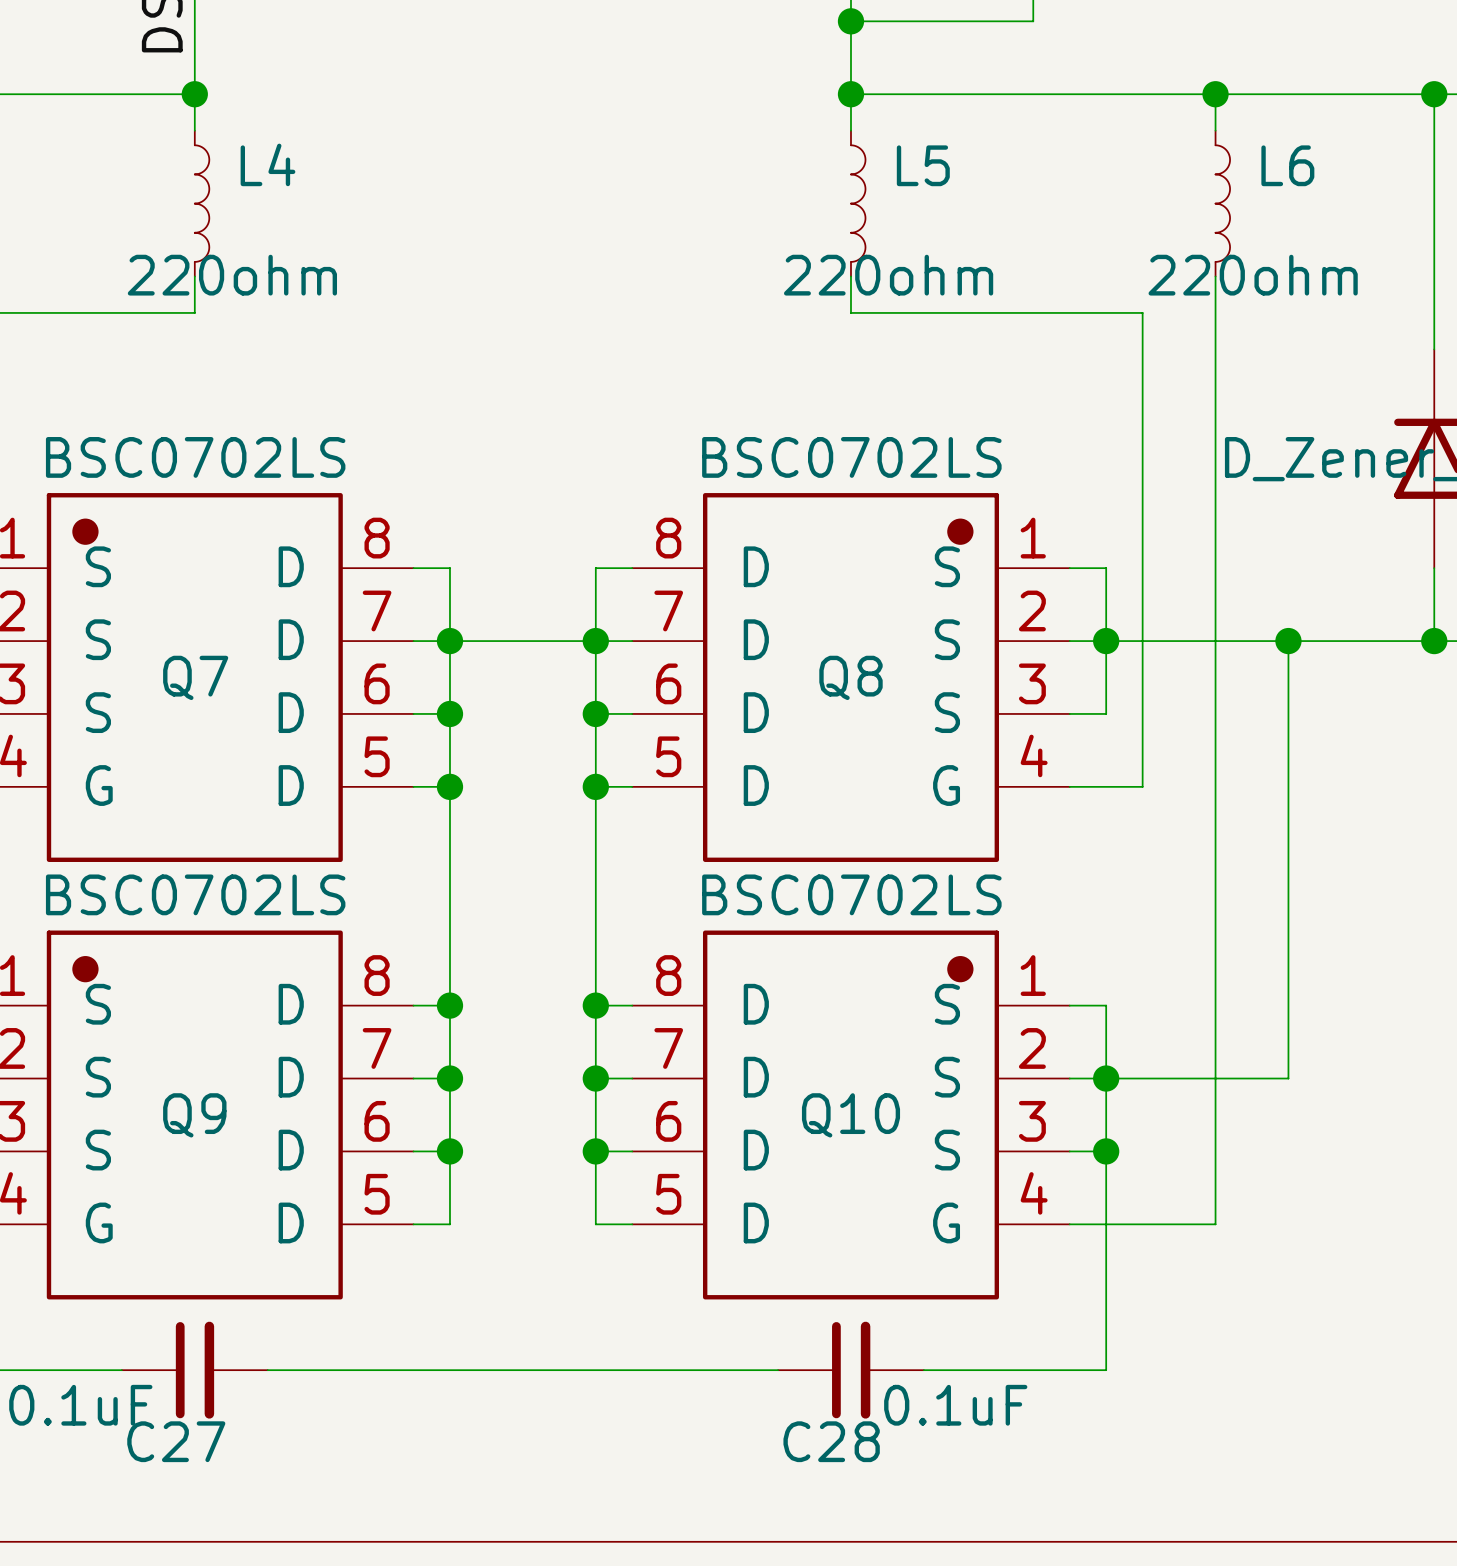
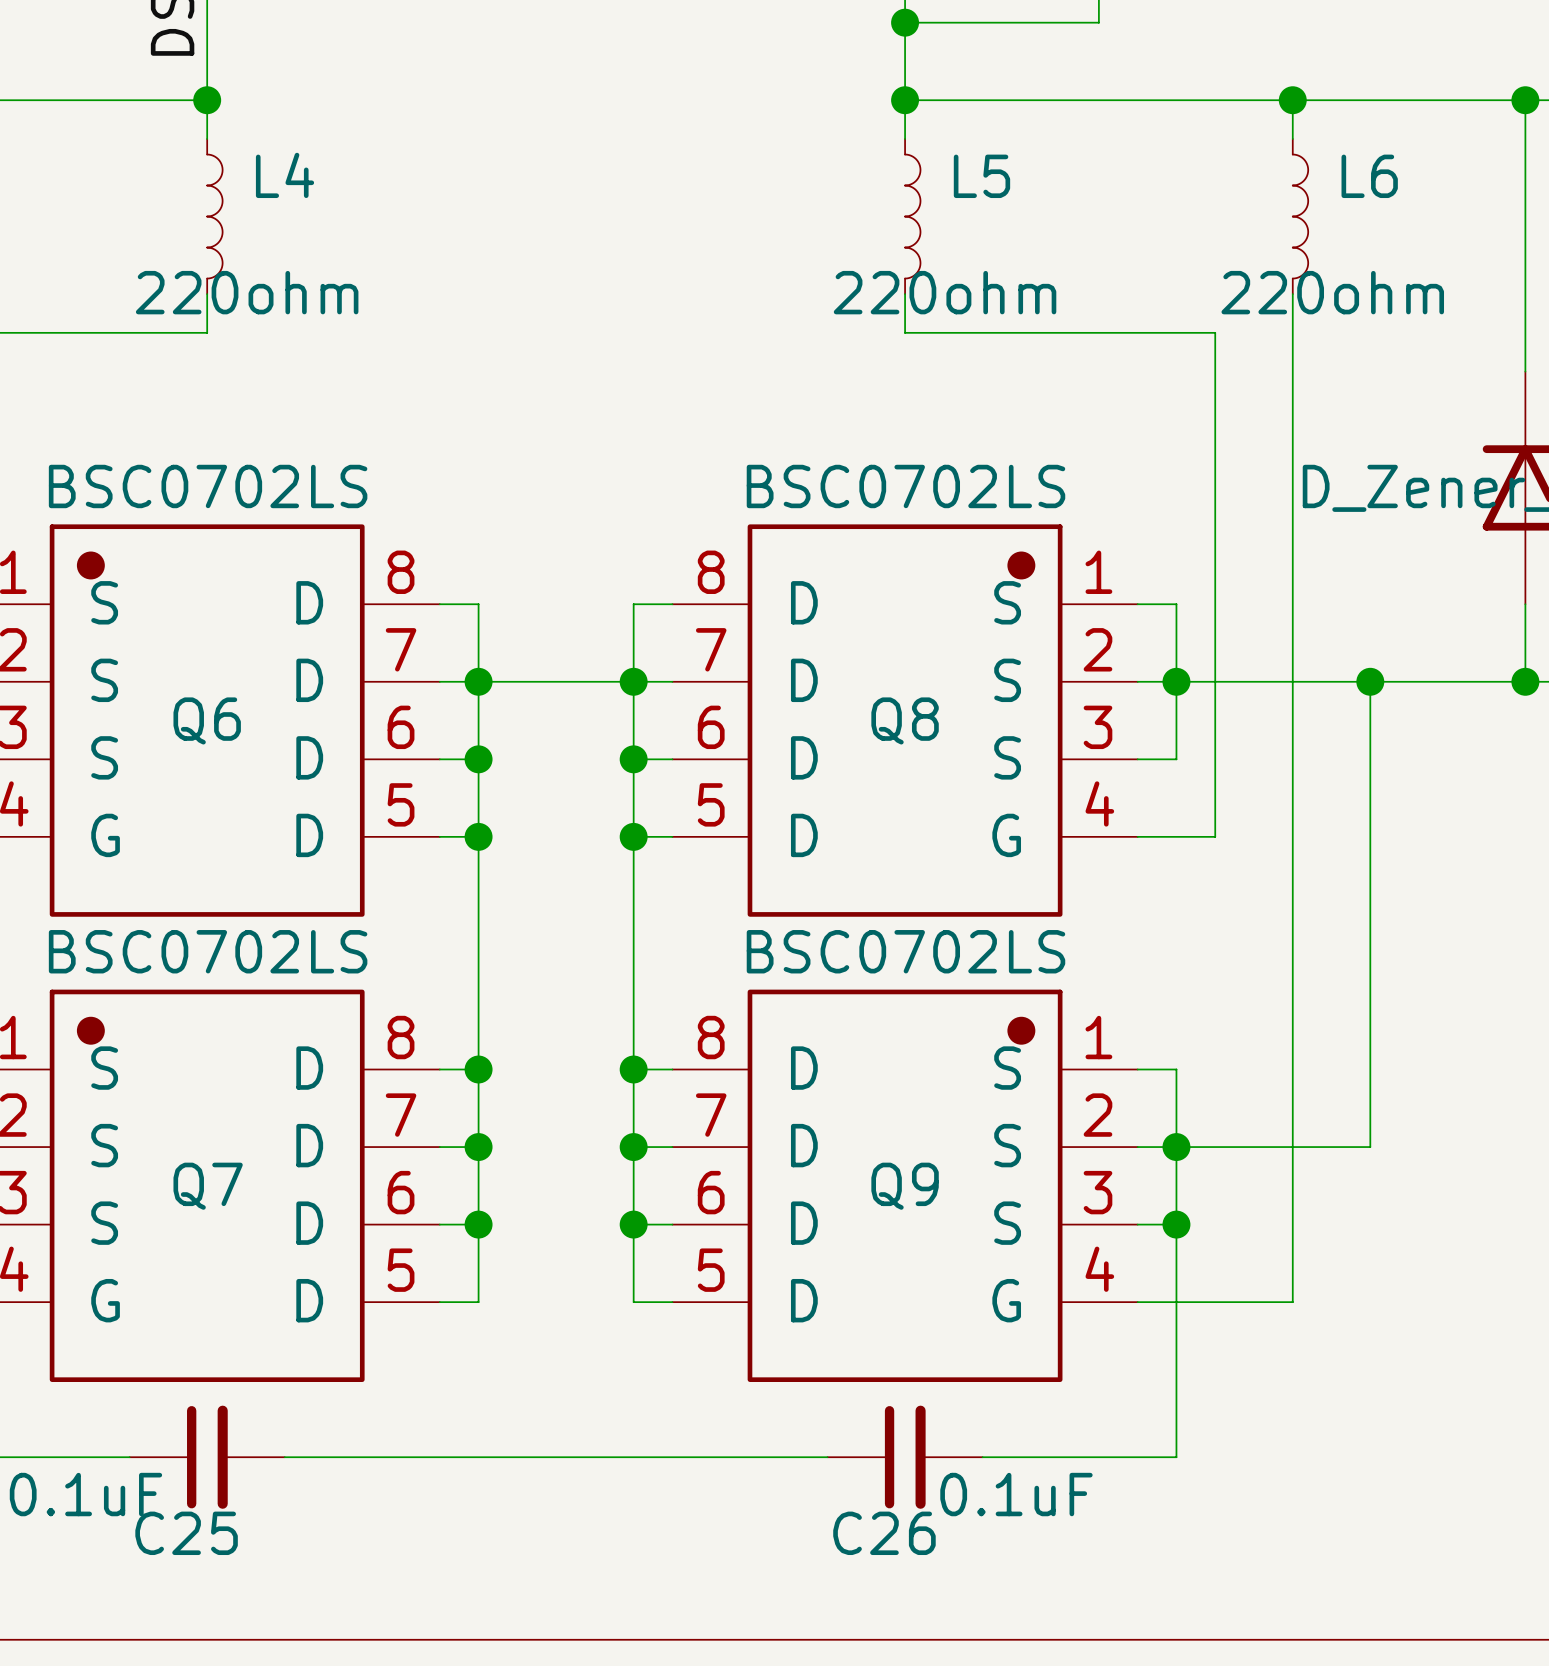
Q7 name: Q7 (195, 677) -> Q6 (207, 720)
Q9 name: Q9 (194, 1115) -> Q7 (208, 1186)
Q10 name: Q10 (850, 1115) -> Q9 (905, 1186)
C27 name: C27 (176, 1441) -> C25 (186, 1533)
C28 name: C28 (831, 1441) -> C26 (884, 1533)

